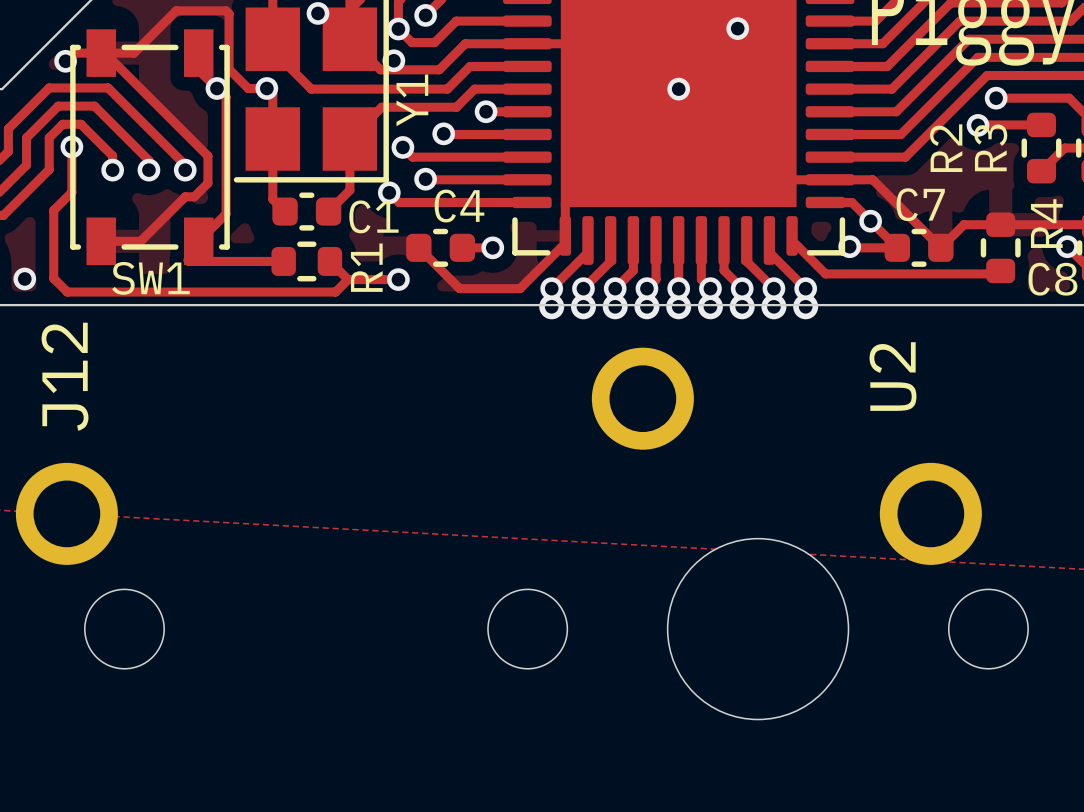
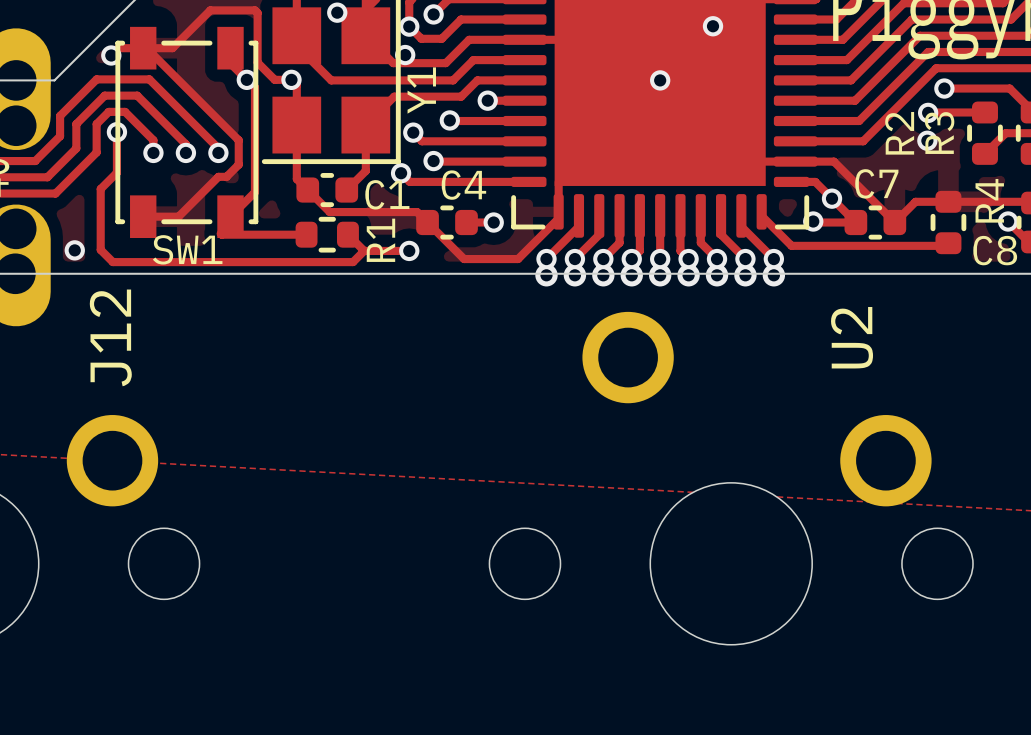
via: none -> (927, 140)
track: none -> (307, 190) (329, 212) (417, 212) (427, 222)

